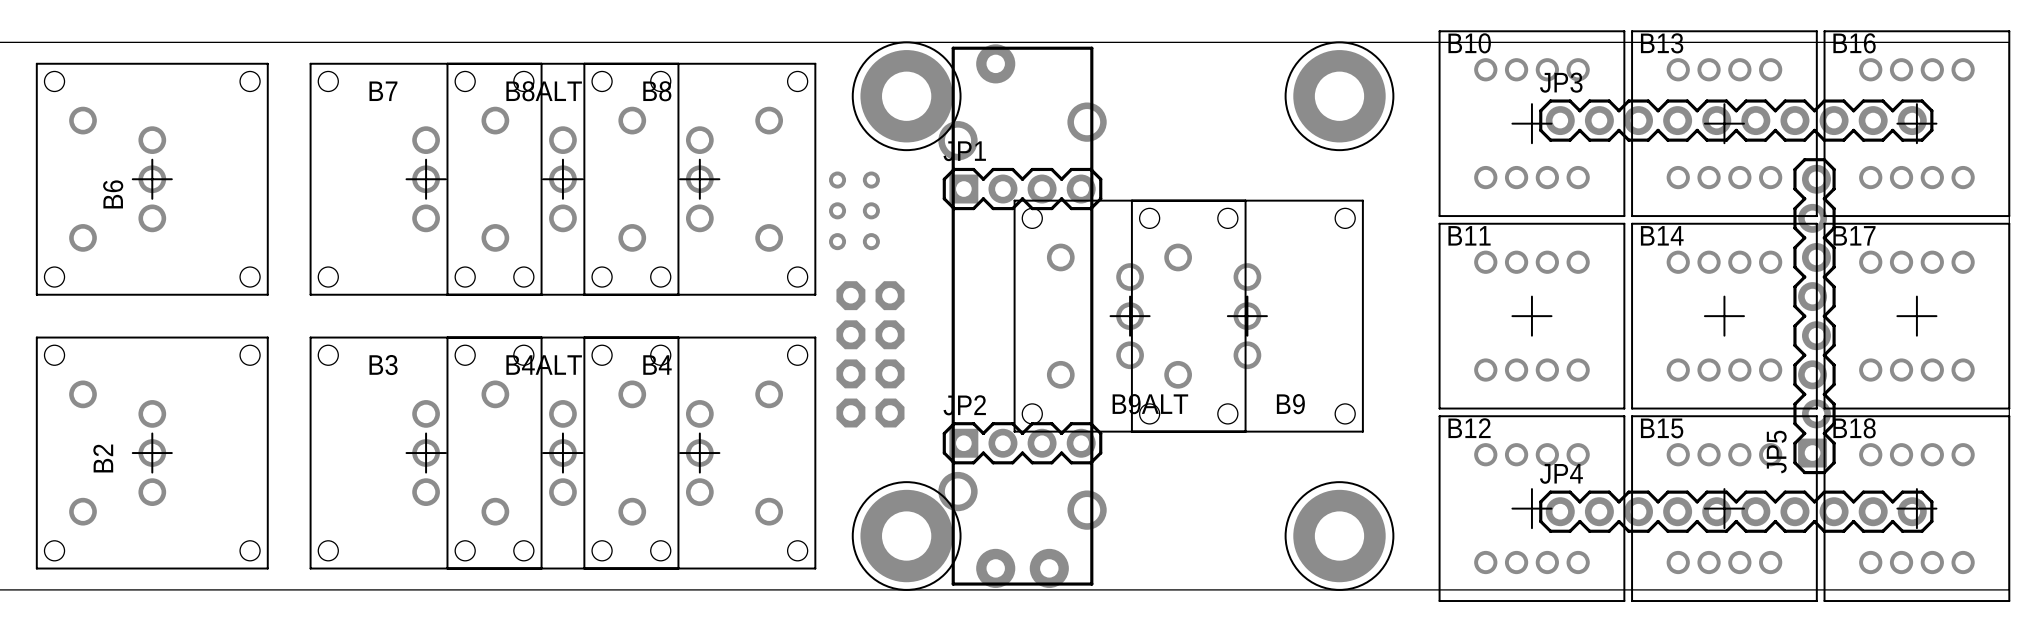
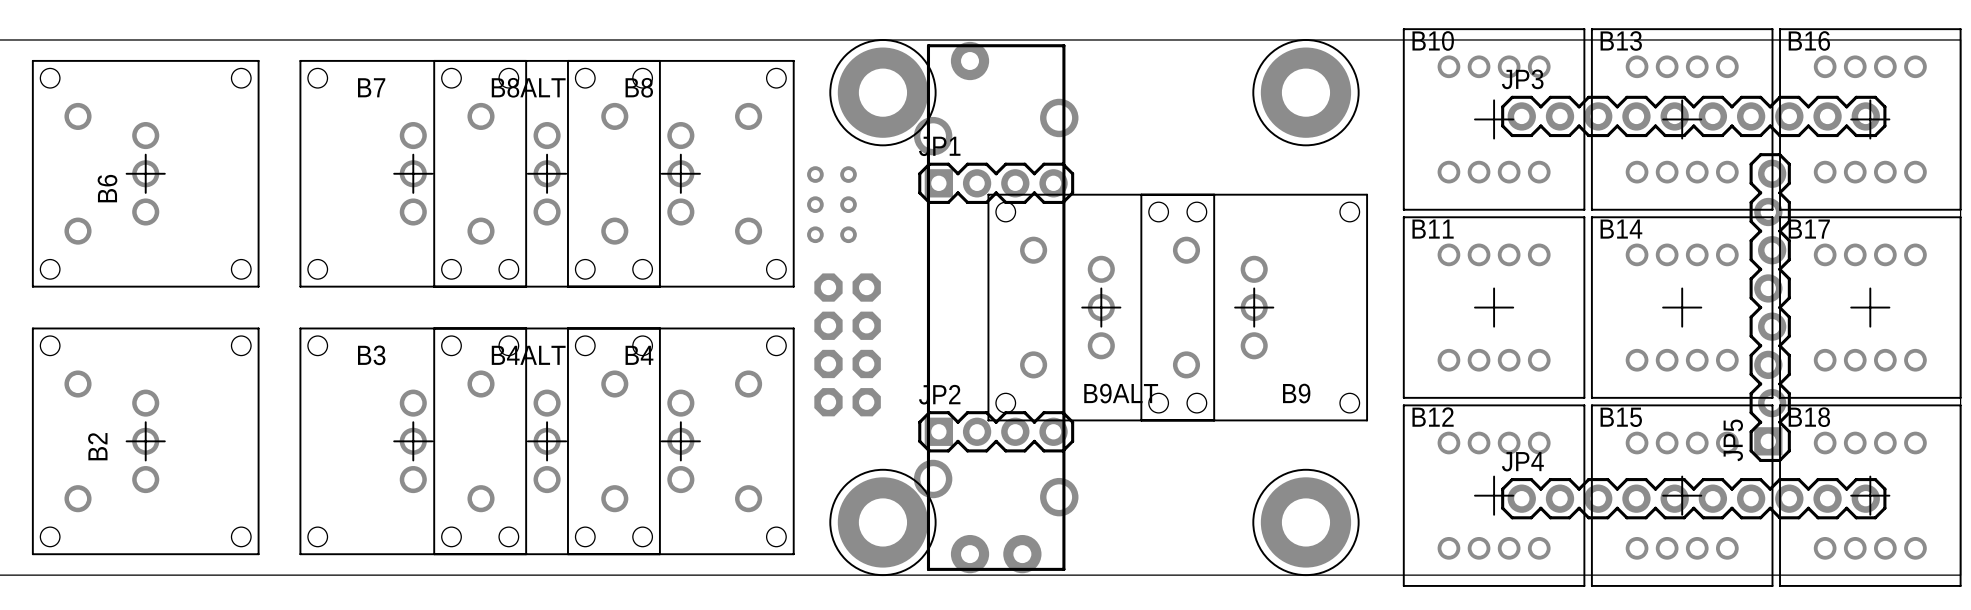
B9 position: (1247, 316) -> (1254, 307)

